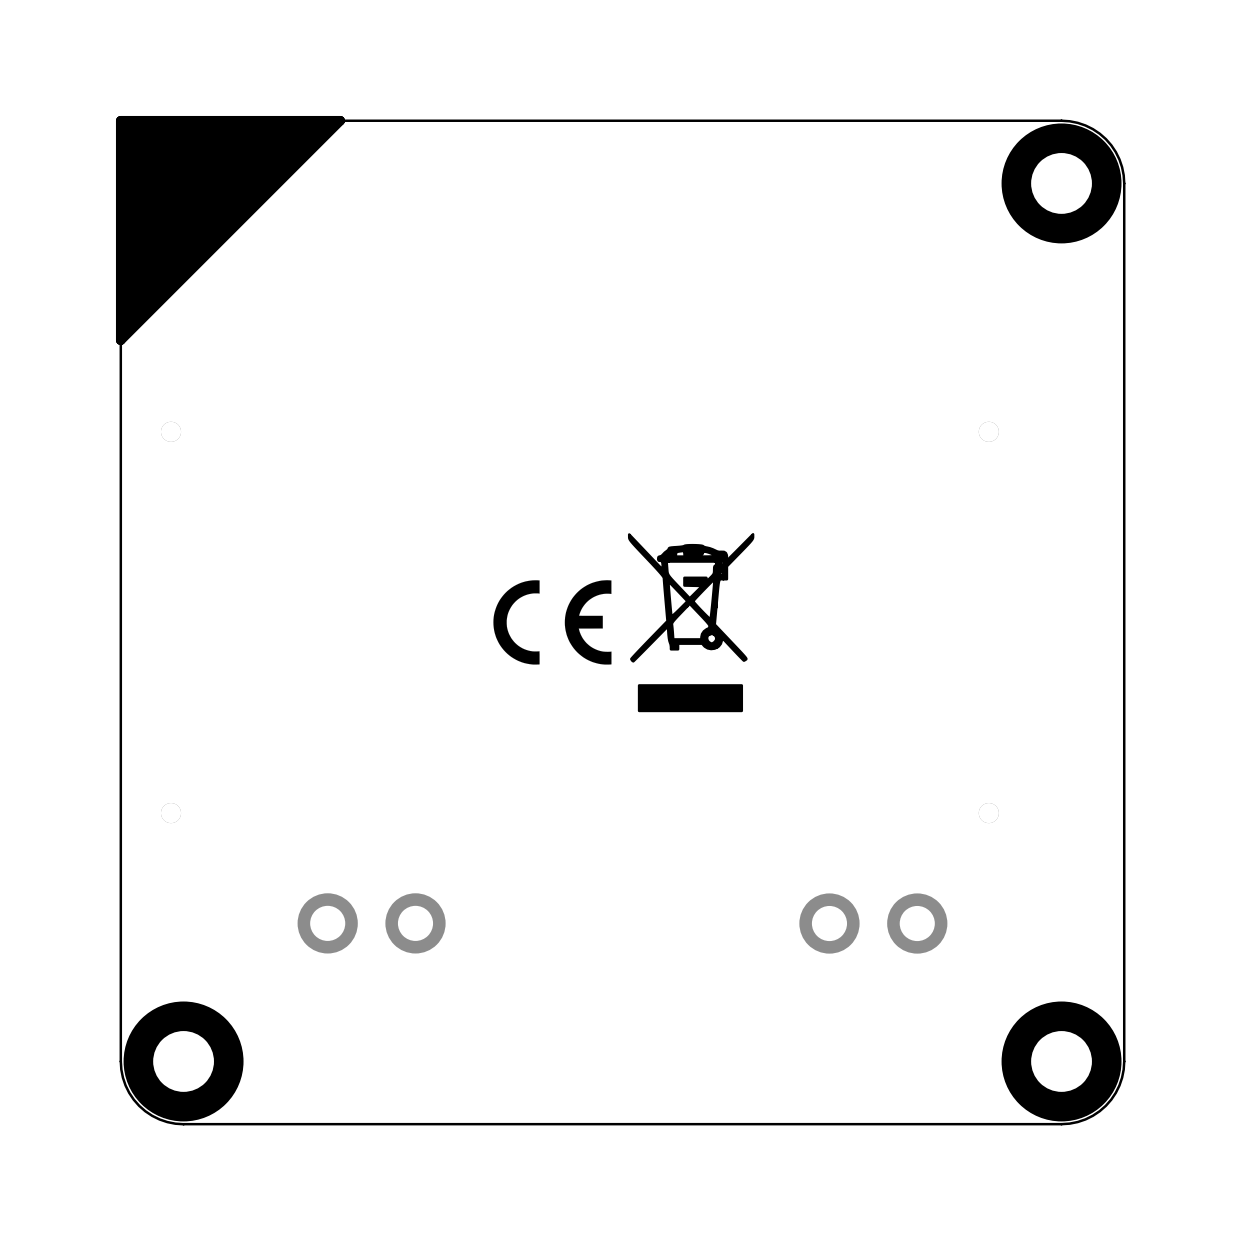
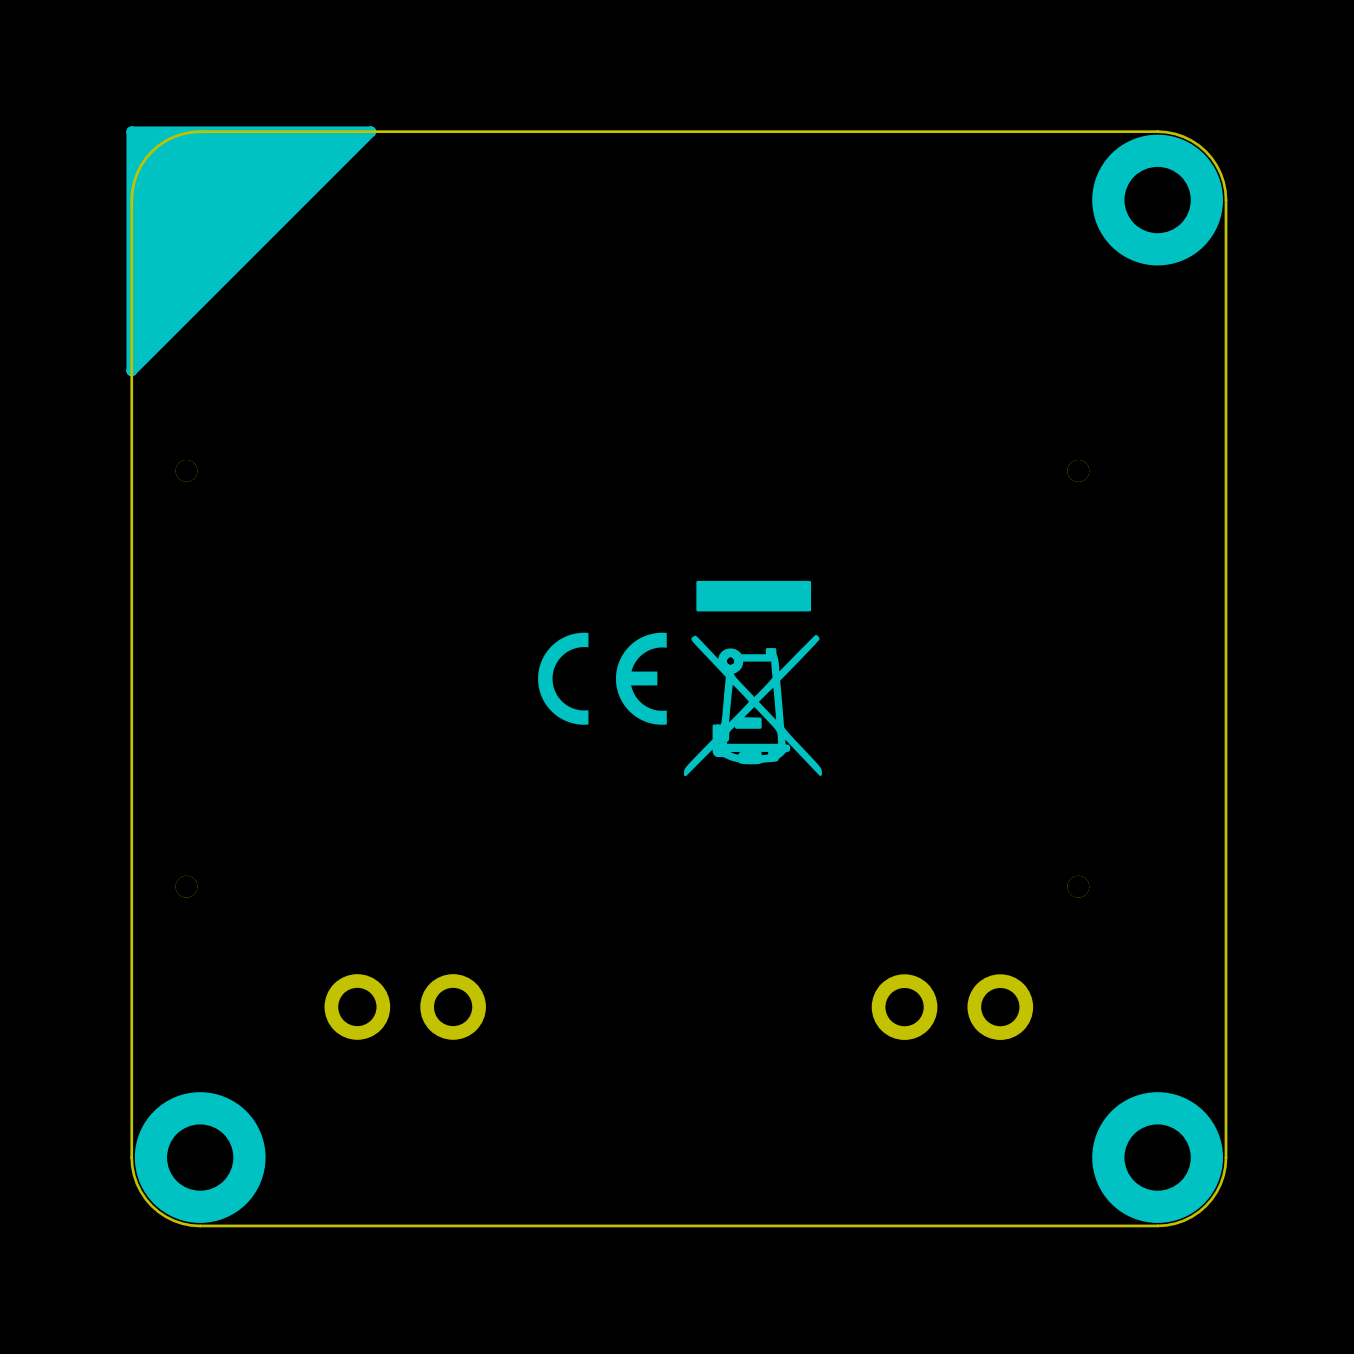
drawing shape: [627, 533, 755, 713] -> [684, 580, 822, 777]

